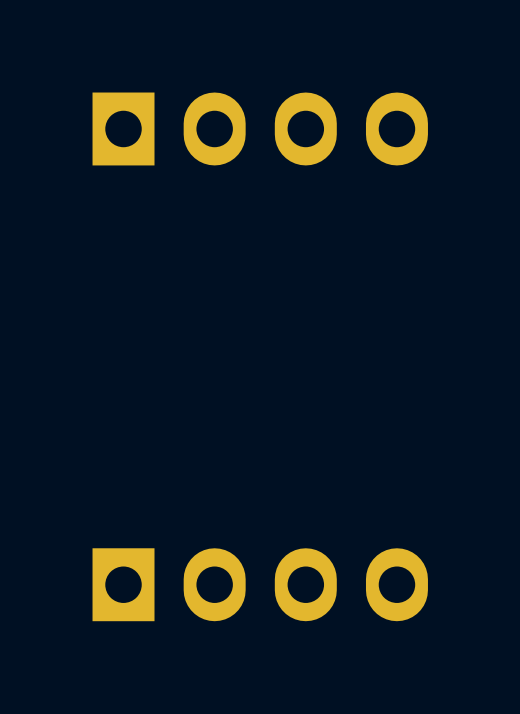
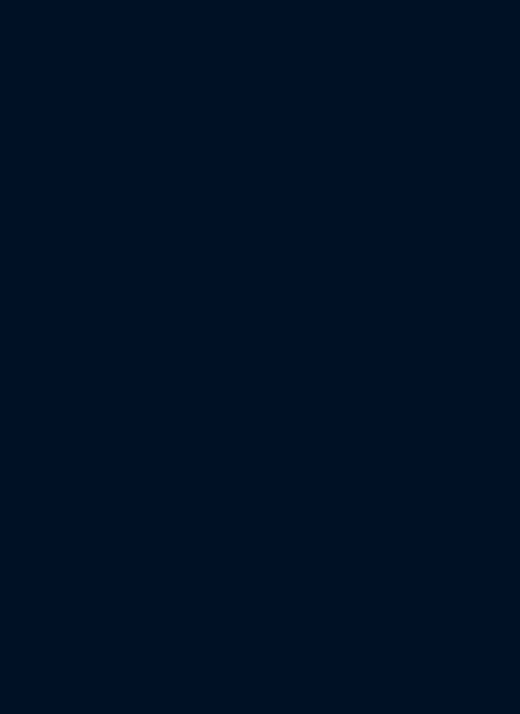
part: (260, 128) -> none
part: (260, 584) -> none

